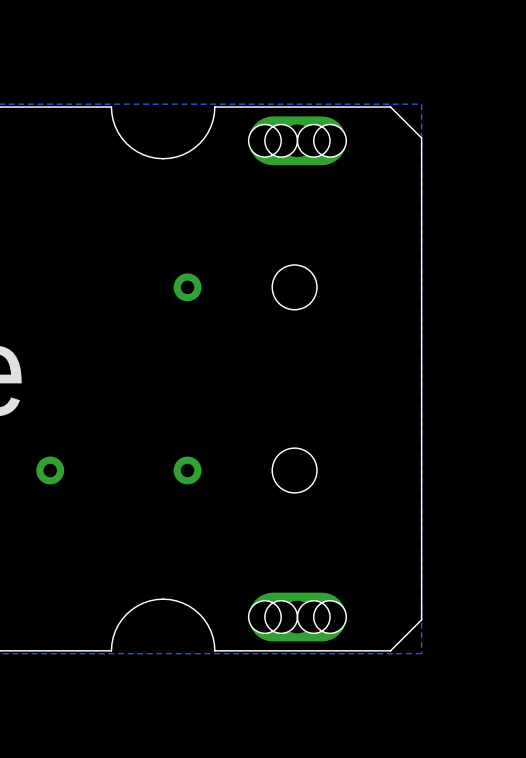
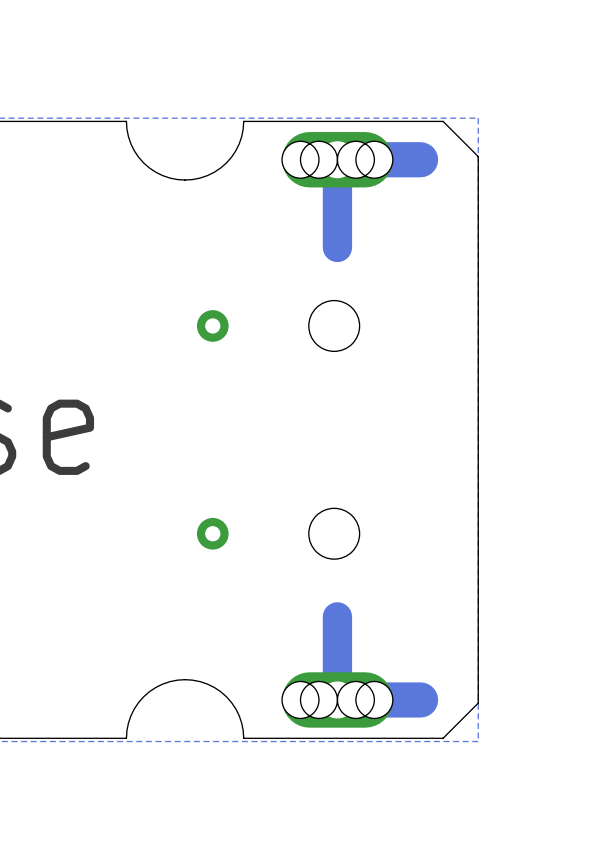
track: none -> (337, 159) (337, 247)
track: none -> (420, 159) (339, 159)
via: (50, 470) -> none
track: none -> (337, 616) (337, 699)
track: none -> (420, 699) (339, 699)

